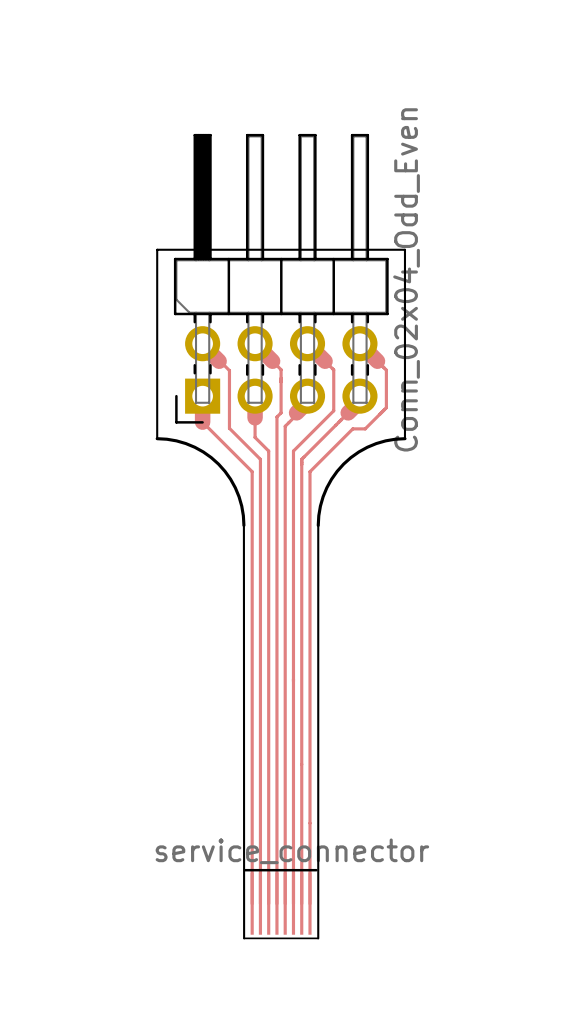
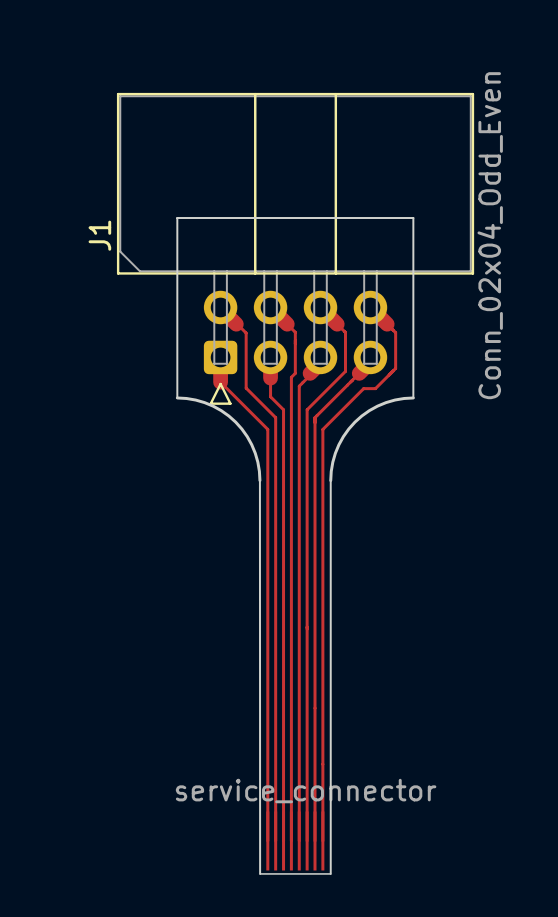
part: Conn_02x04_Odd_Even (281, 278) -> none
J1: none -> Conn_02x04_Odd_Even (295, 248)
line: (245, 870) (316, 870) -> none

